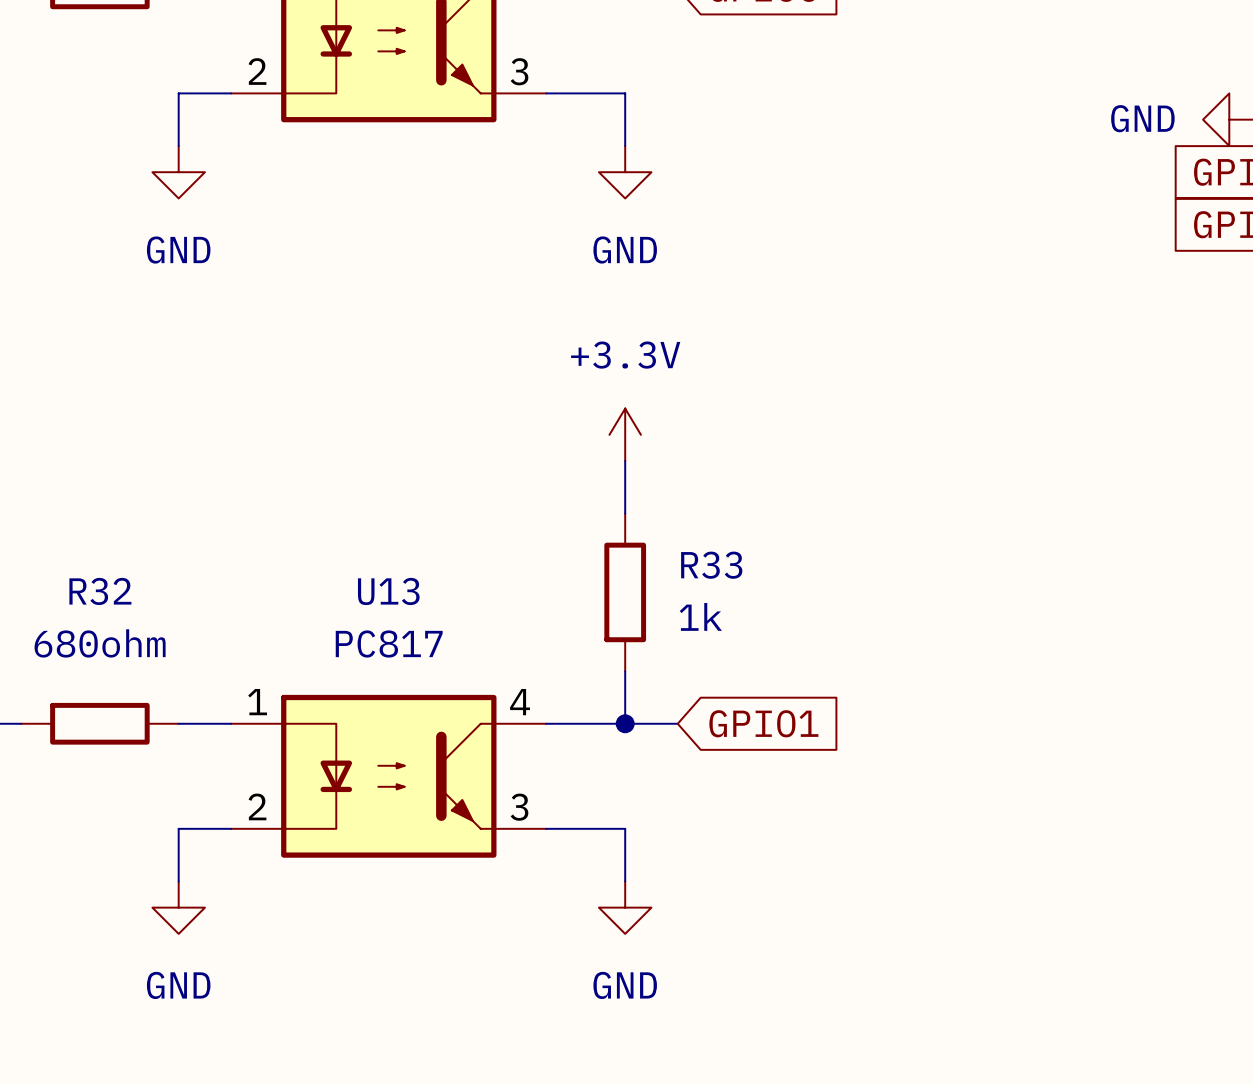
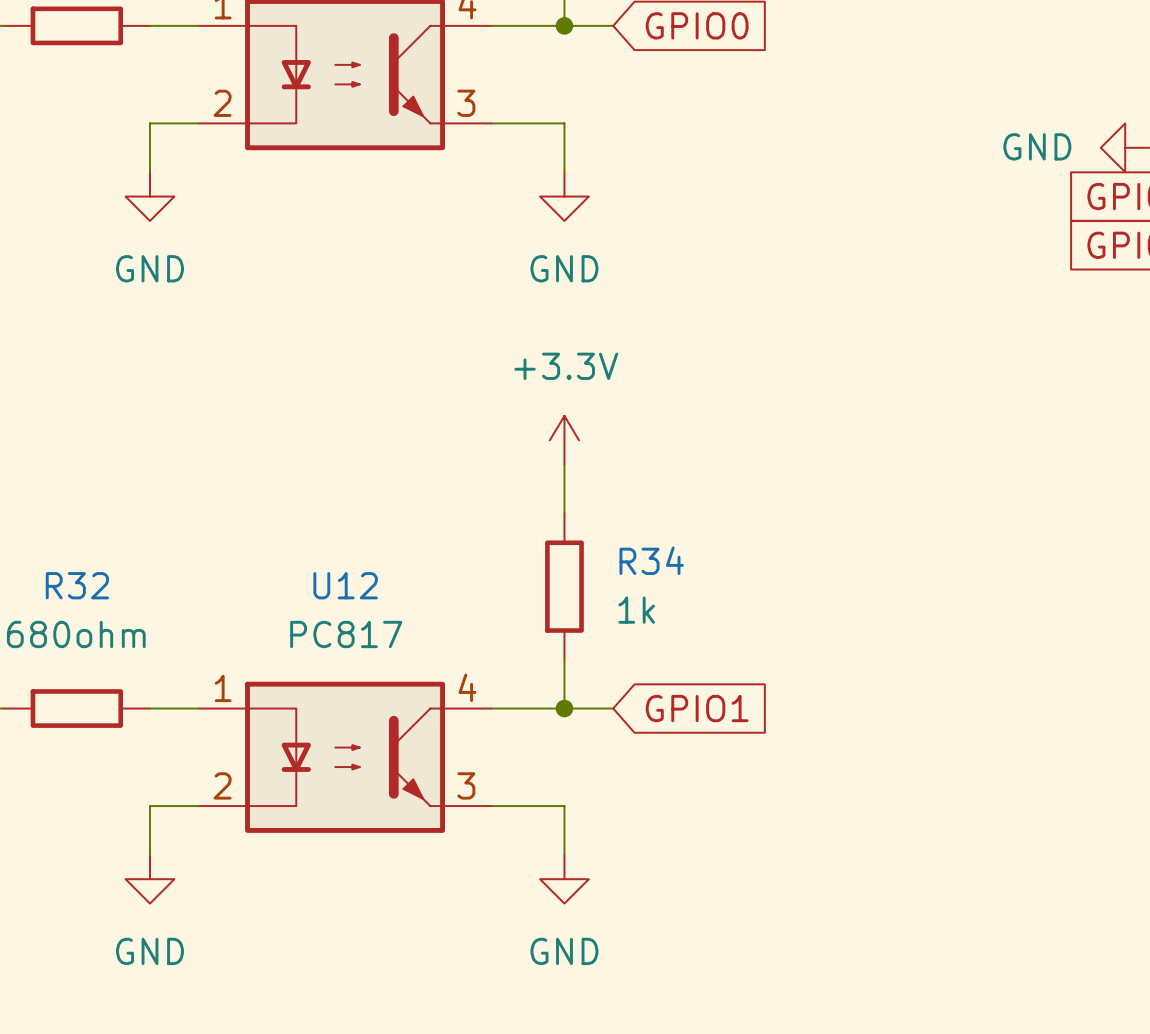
R33 name: R33 (711, 565) -> R34 (651, 560)
U13 name: U13 (388, 591) -> U12 (345, 585)

